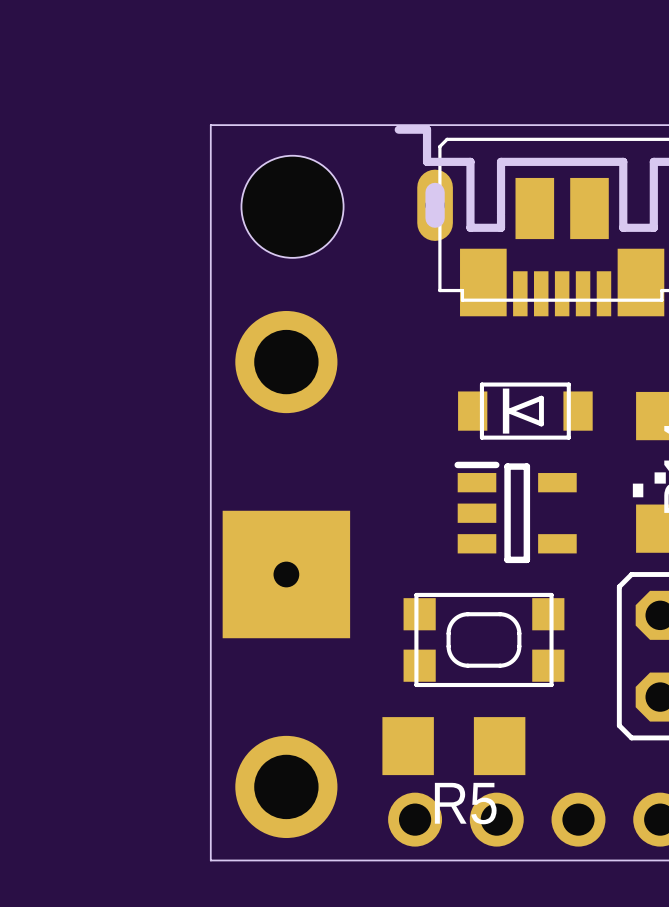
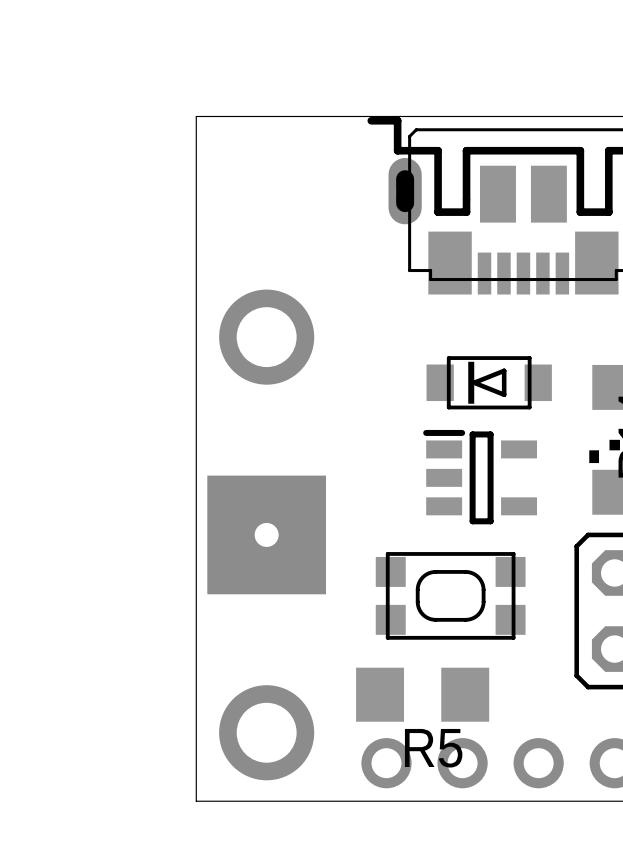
part: (292, 206) -> none

